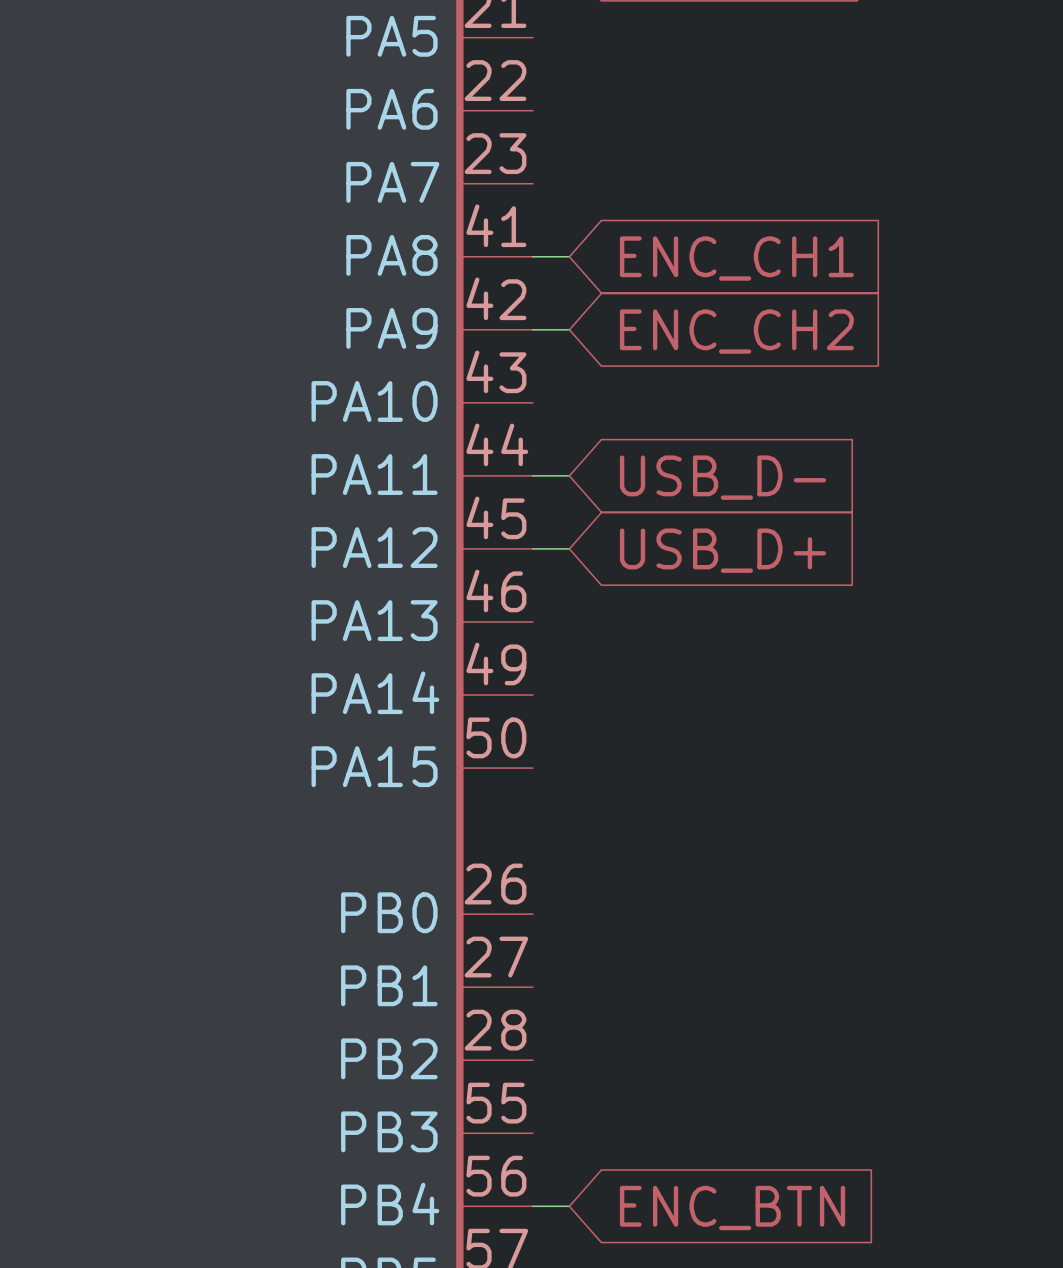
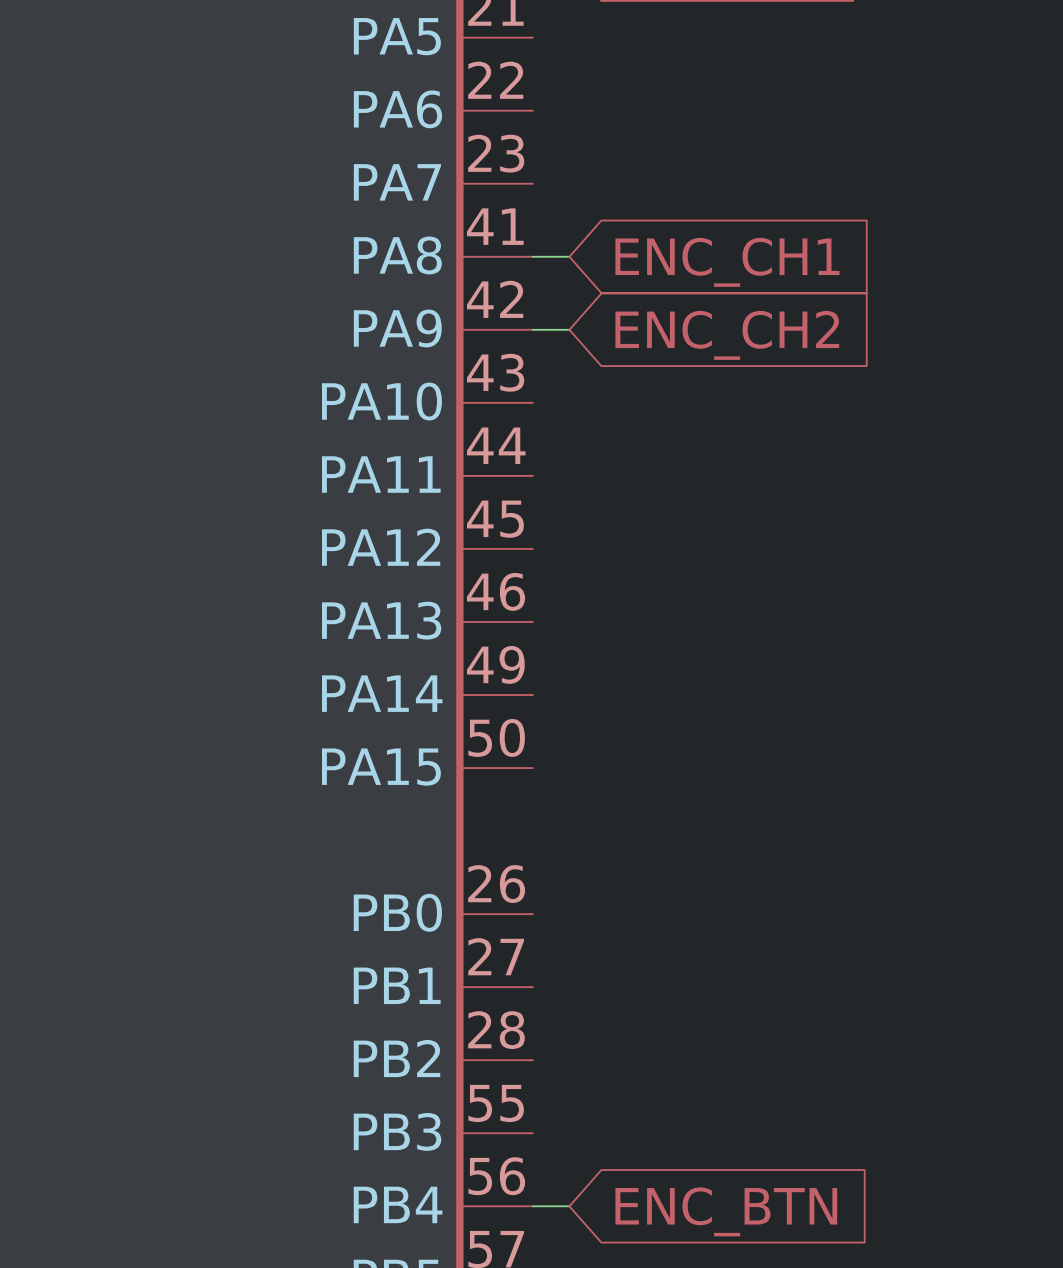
wire: (532, 475) (569, 475) -> none
global label: USB_D- (722, 477) -> none
wire: (532, 548) (569, 548) -> none
global label: USB_D+ (722, 550) -> none

